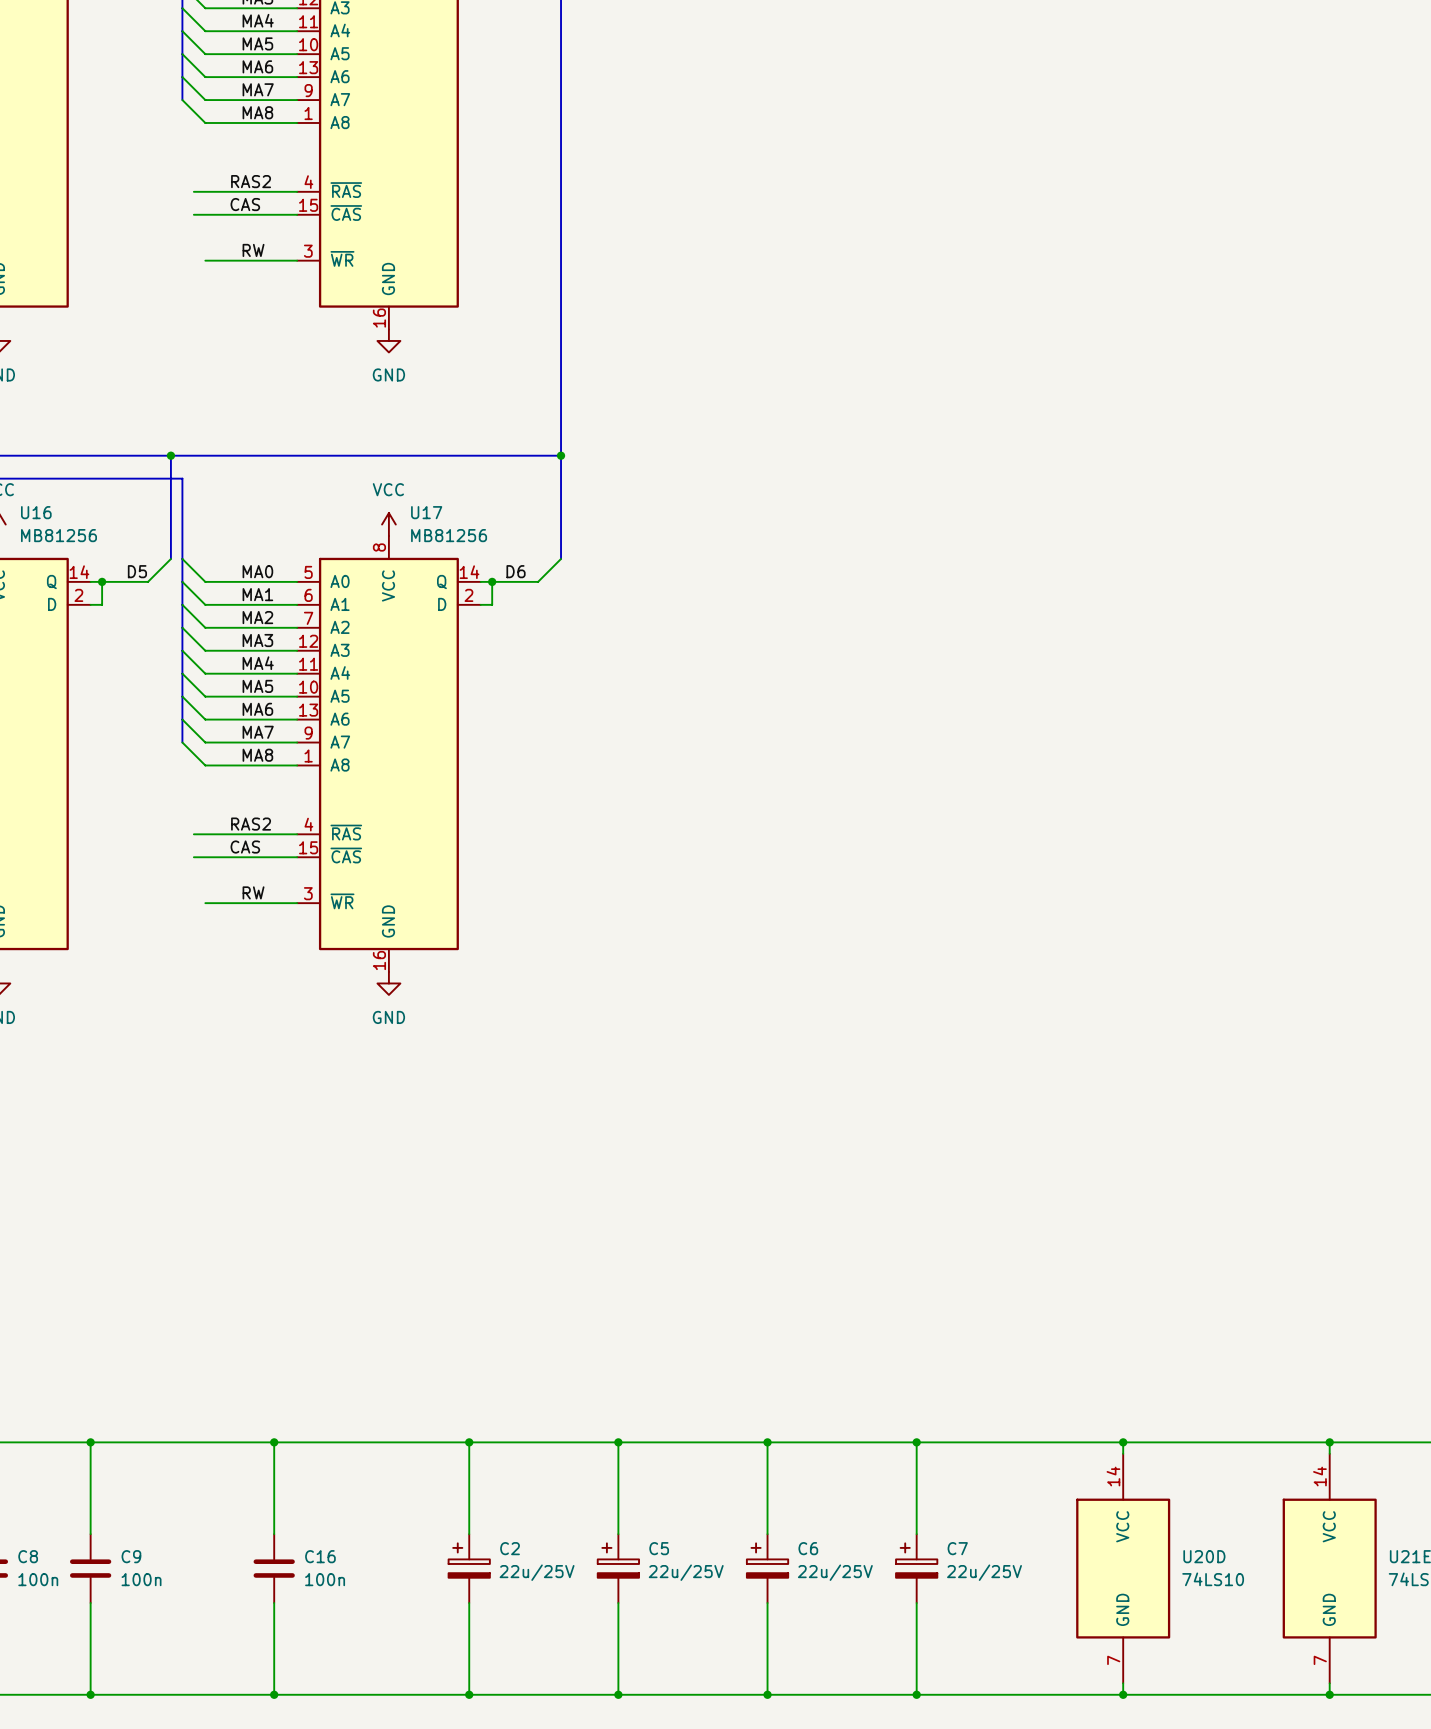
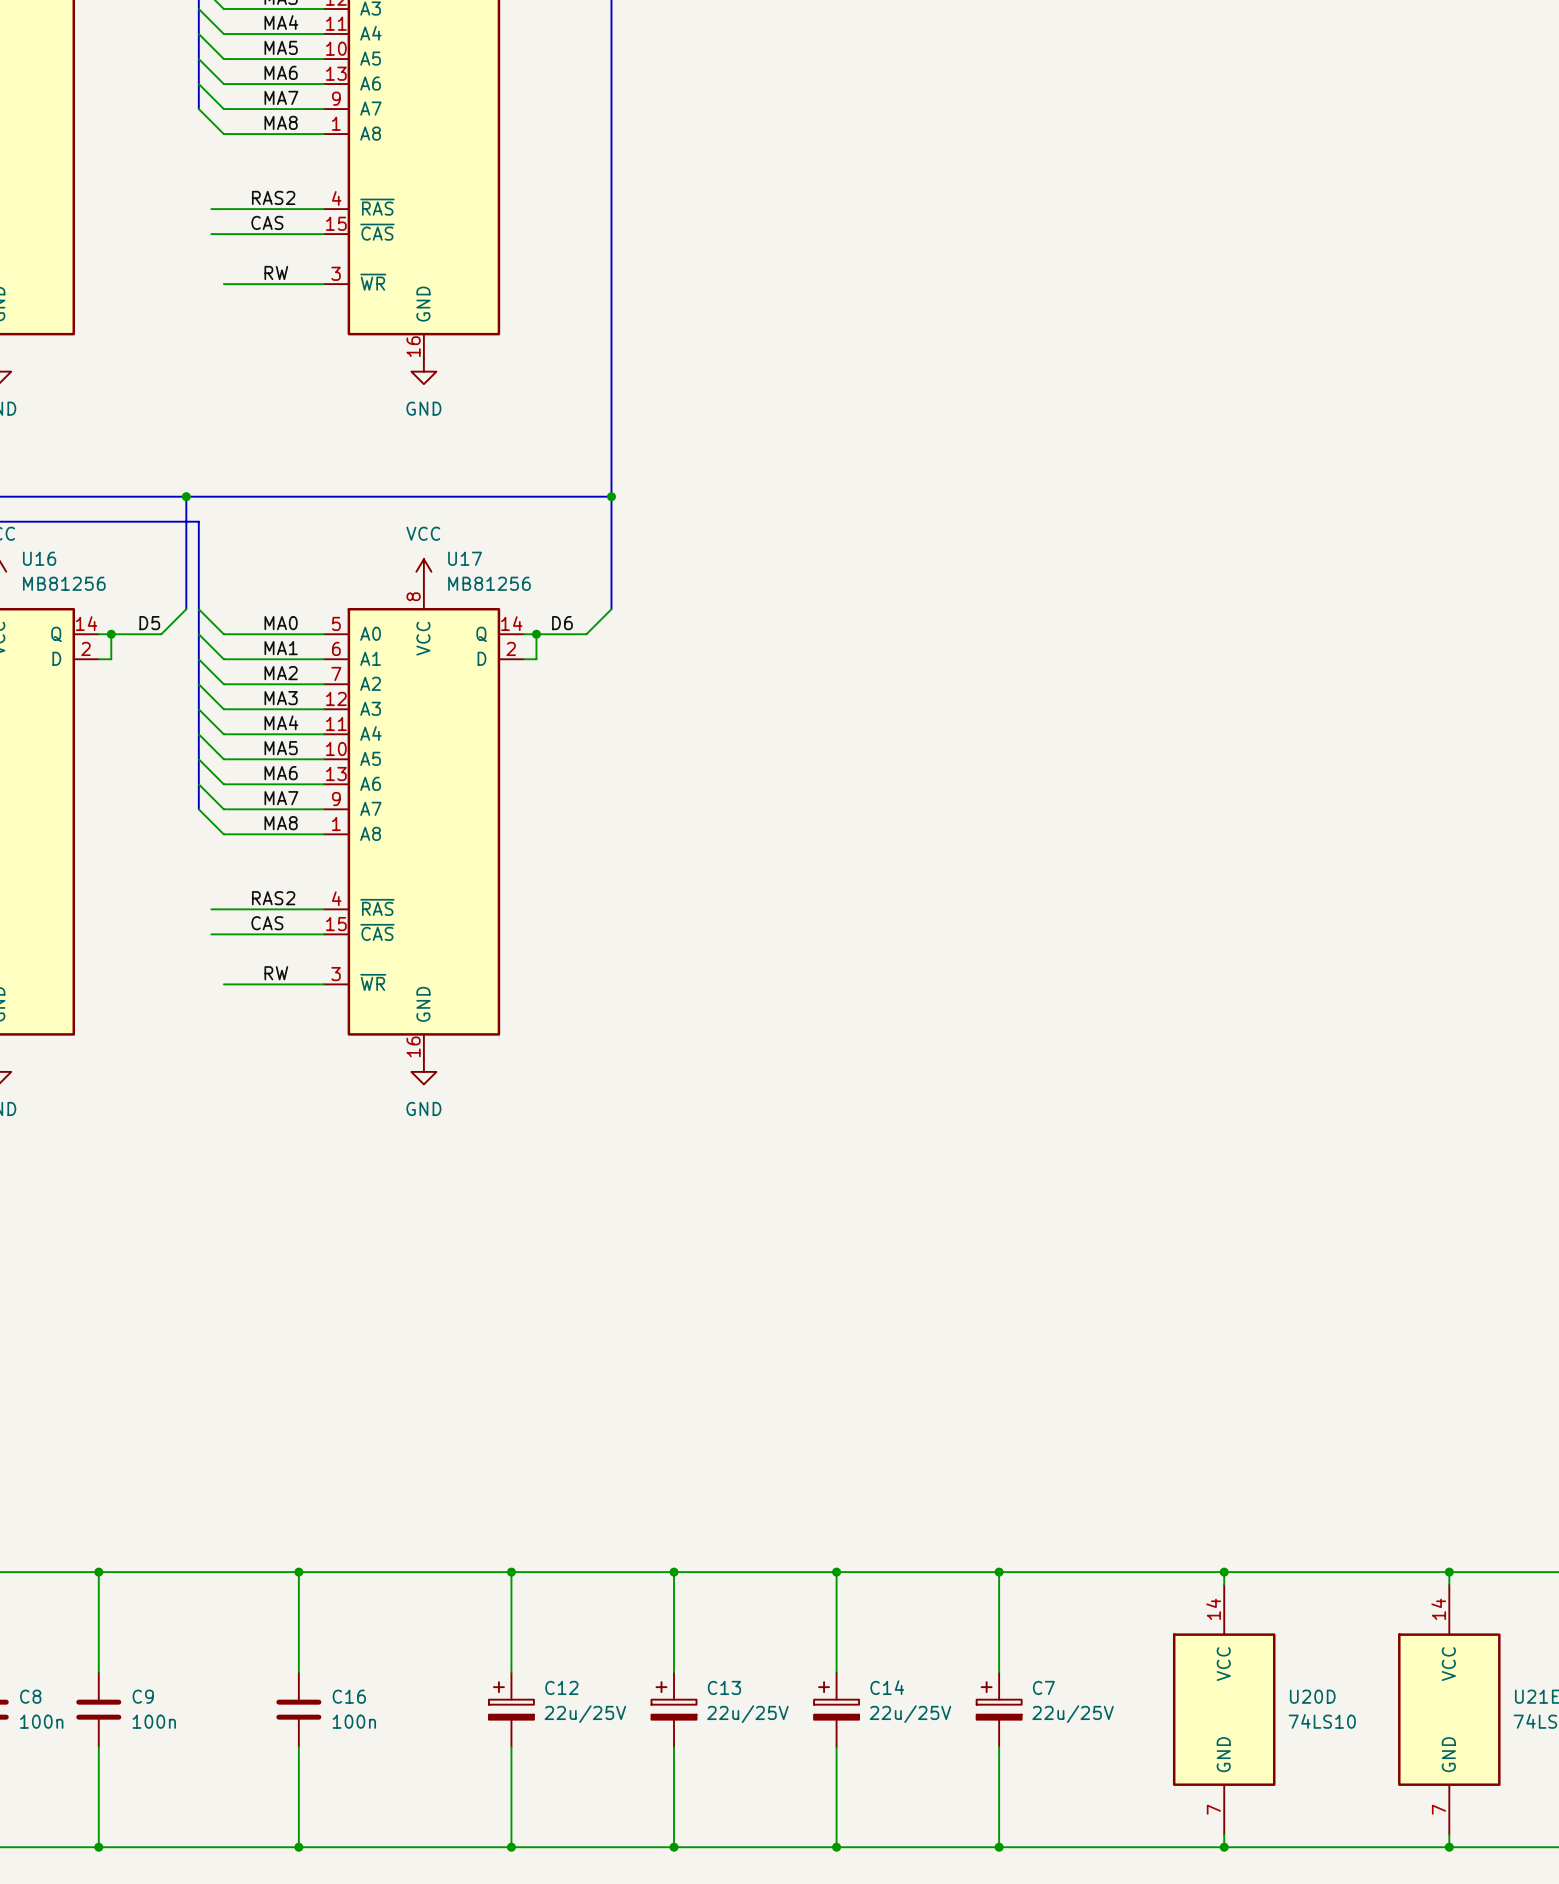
C2 name: C2 (510, 1548) -> C12 (561, 1687)
C5 name: C5 (659, 1548) -> C13 (724, 1687)
C6 name: C6 (808, 1548) -> C14 (887, 1687)

